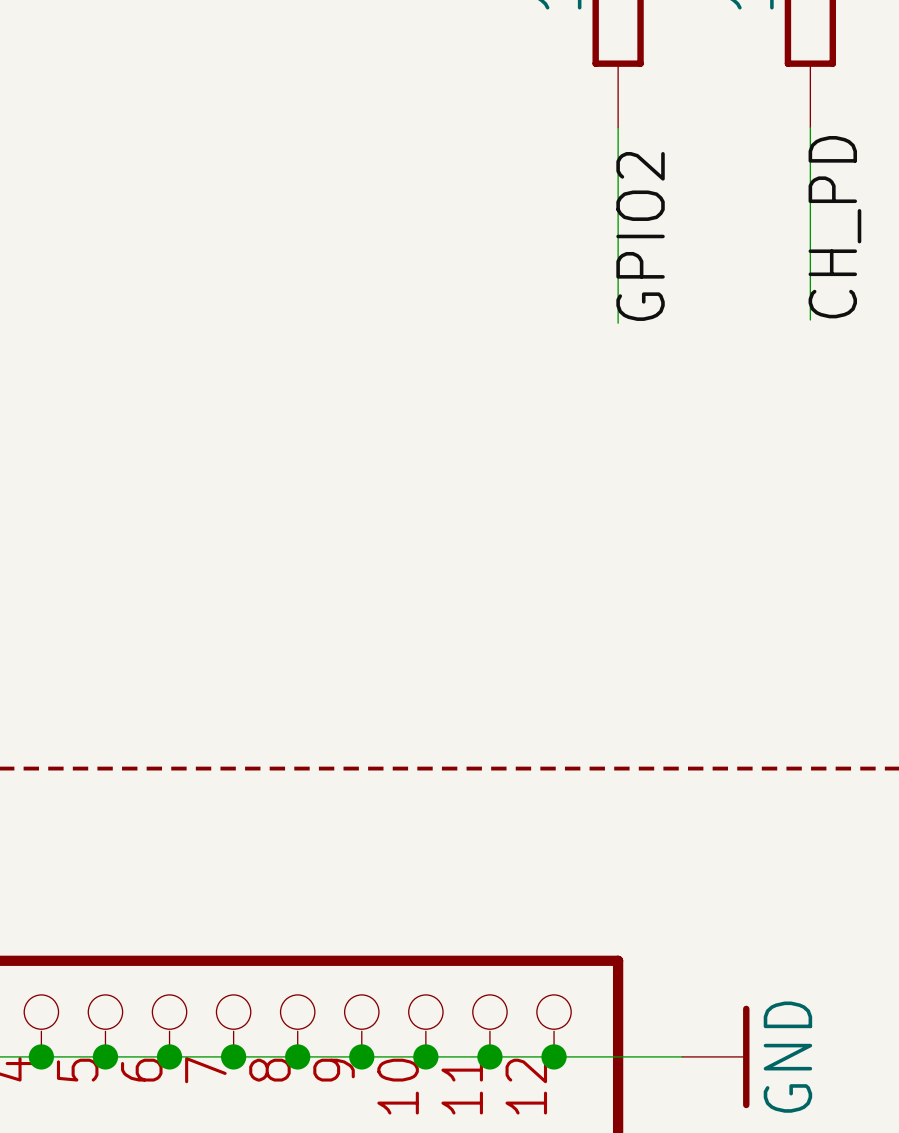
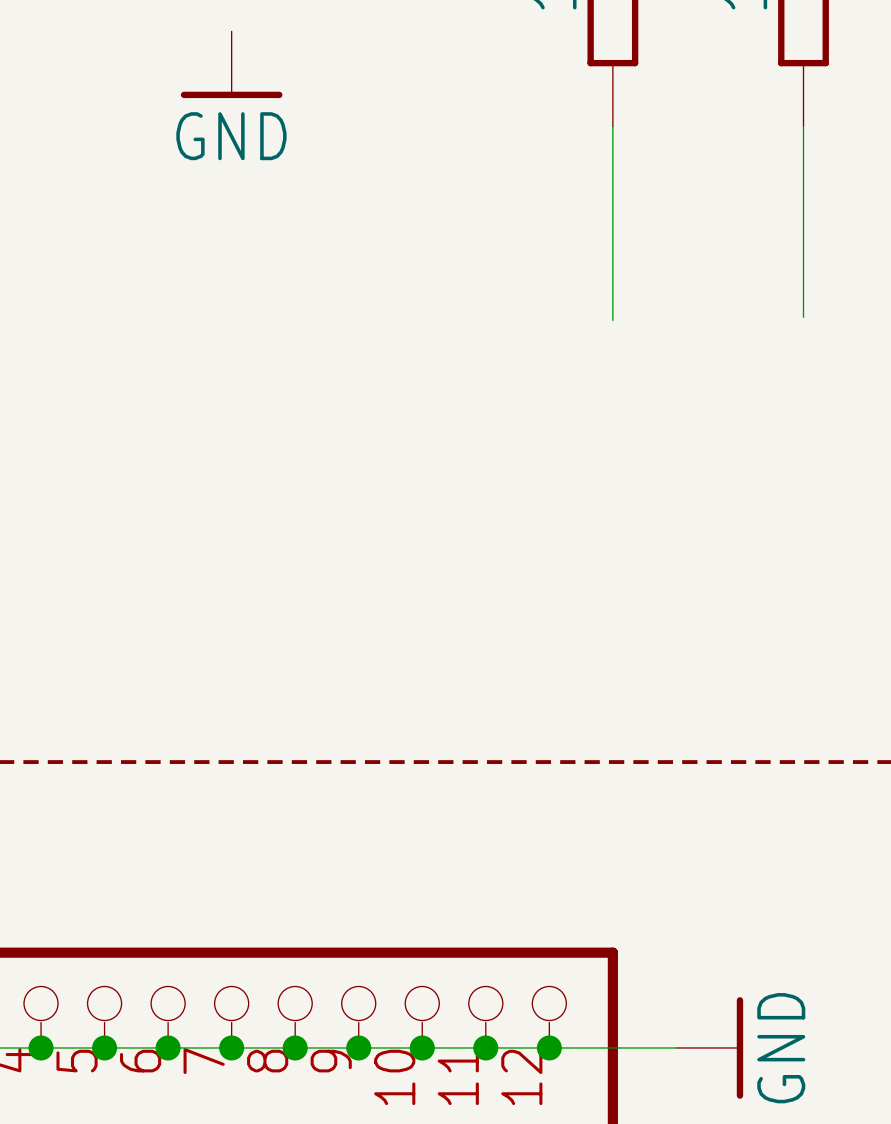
power symbol: none -> GND (231, 64)
label: CH_PD (834, 227) -> none
label: GPIO2 (640, 236) -> none

